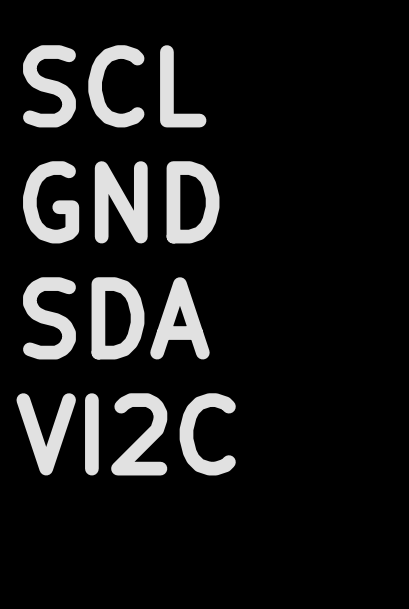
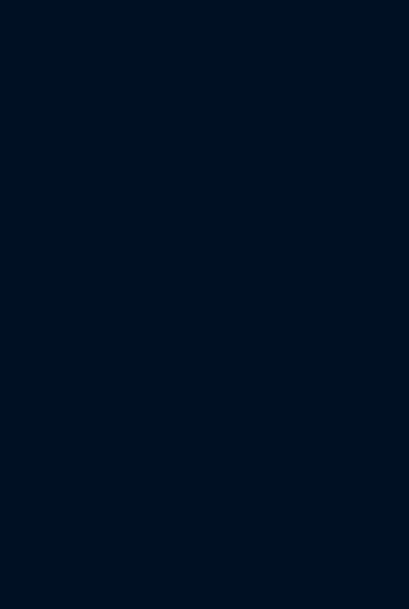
text: SCL (114, 86) -> none
text: GND (121, 202) -> none
text: SDA (116, 318) -> none
text: VI2C (126, 434) -> none

